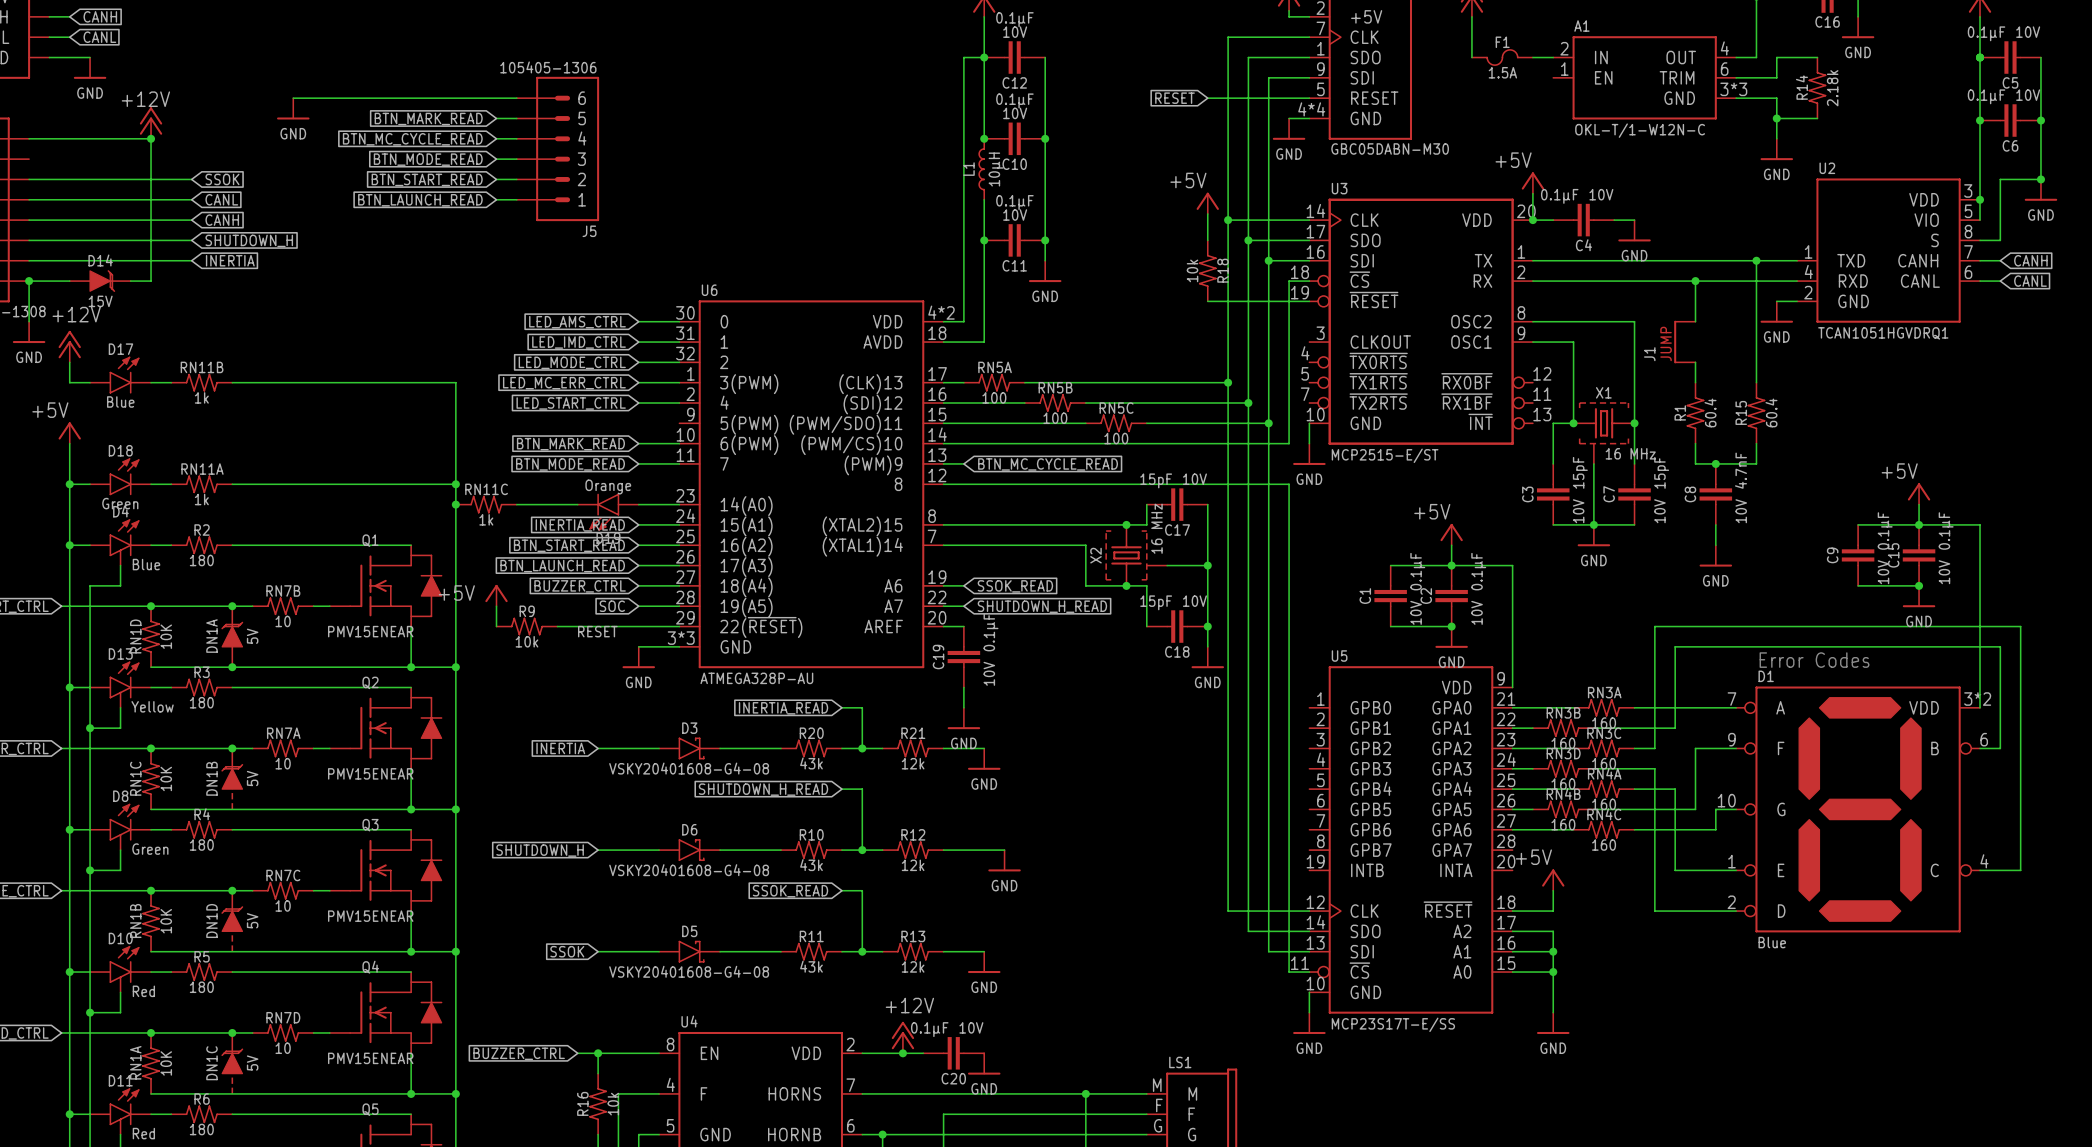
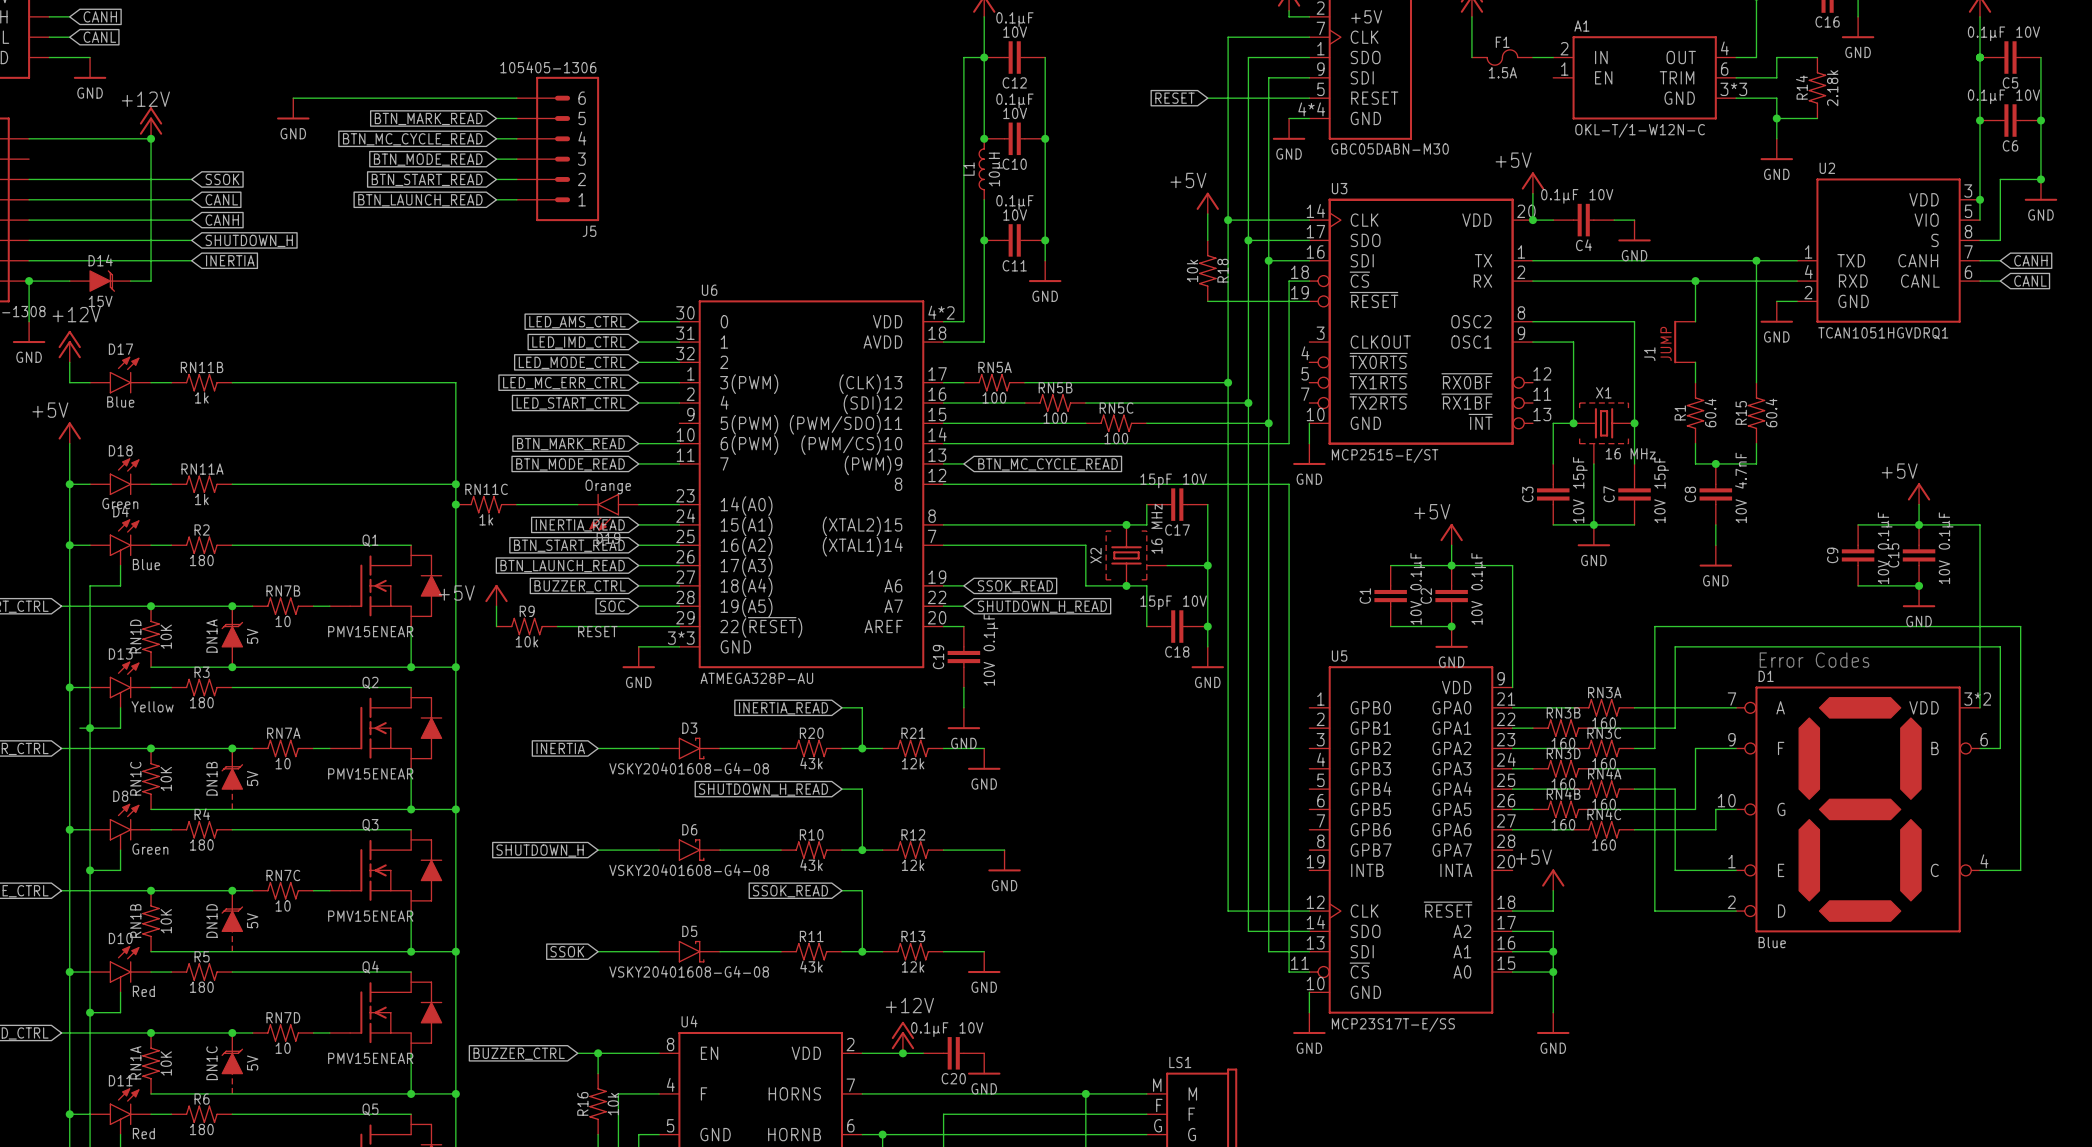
wire: none -> (79, 728) (90, 728)

